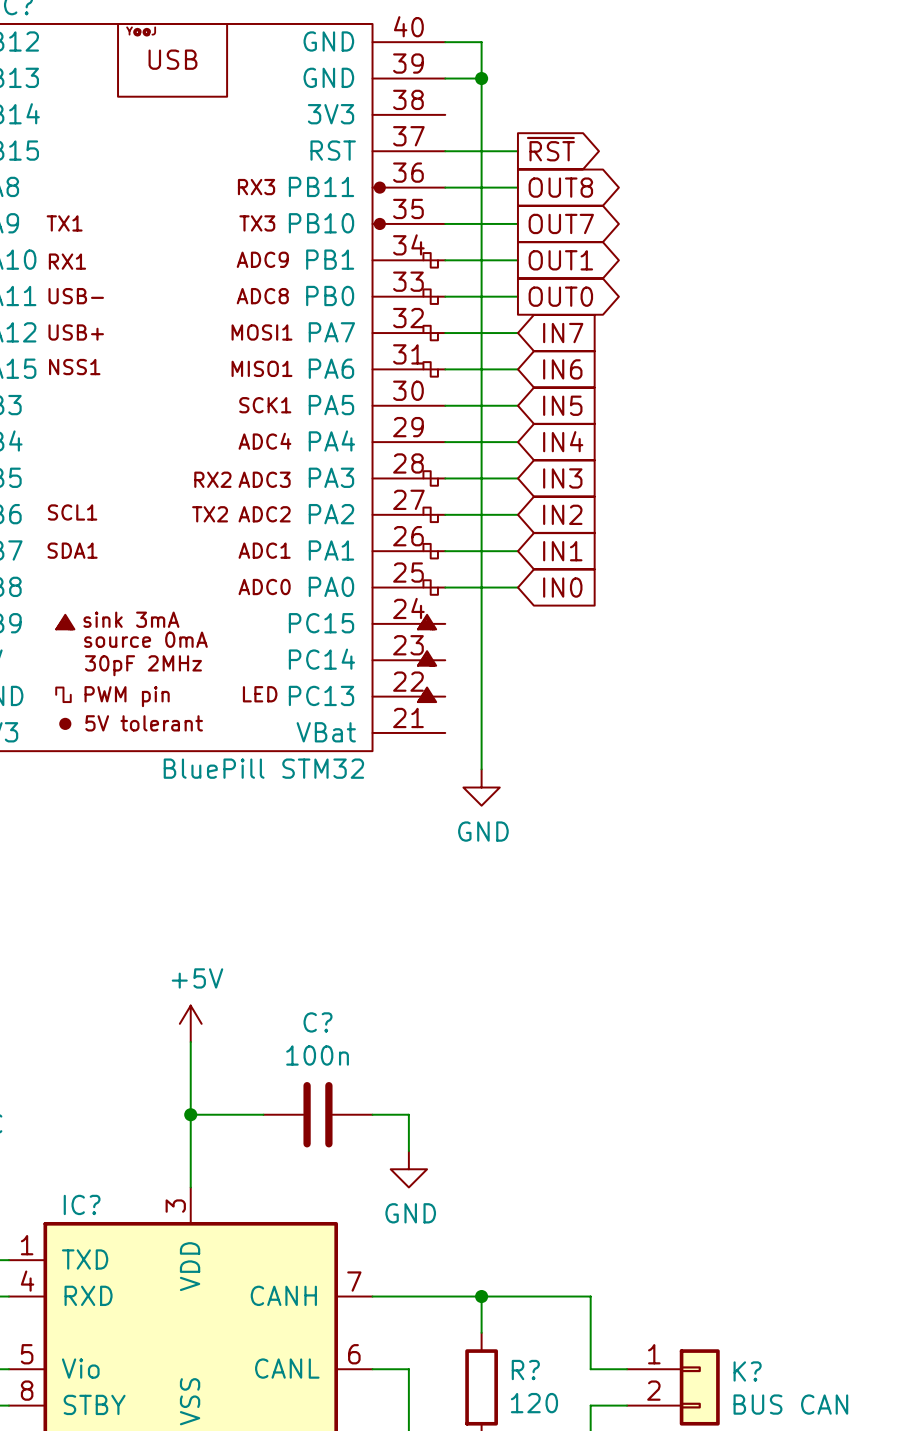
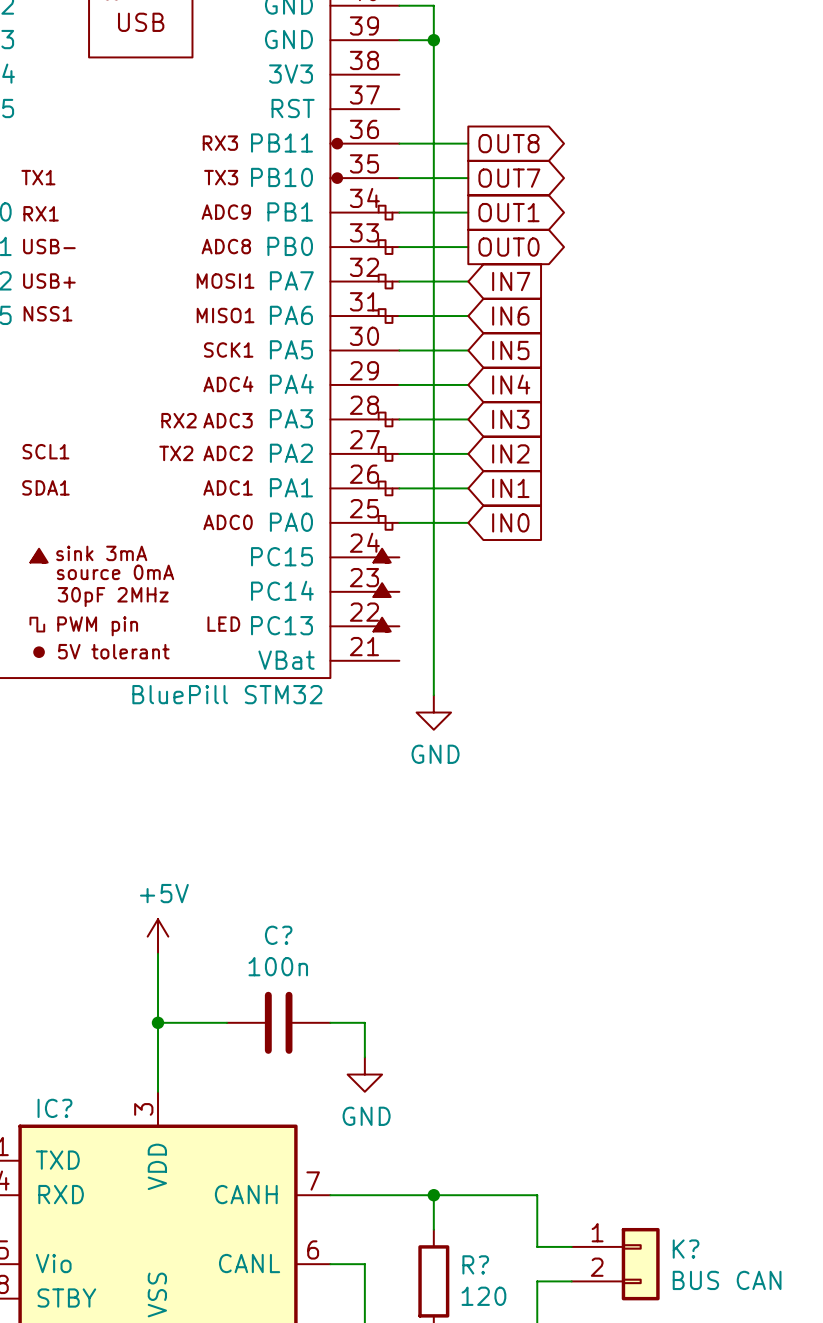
global label: ~{RST} (550, 149) -> none
wire: (445, 151) (517, 151) -> none
wire: (590, 1351) (590, 1369) (627, 1369) -> (537, 1246) (571, 1246)
K? position: (673, 1387) -> (615, 1264)
wire: (590, 1405) (627, 1405) -> (537, 1298) (537, 1281) (571, 1281)

